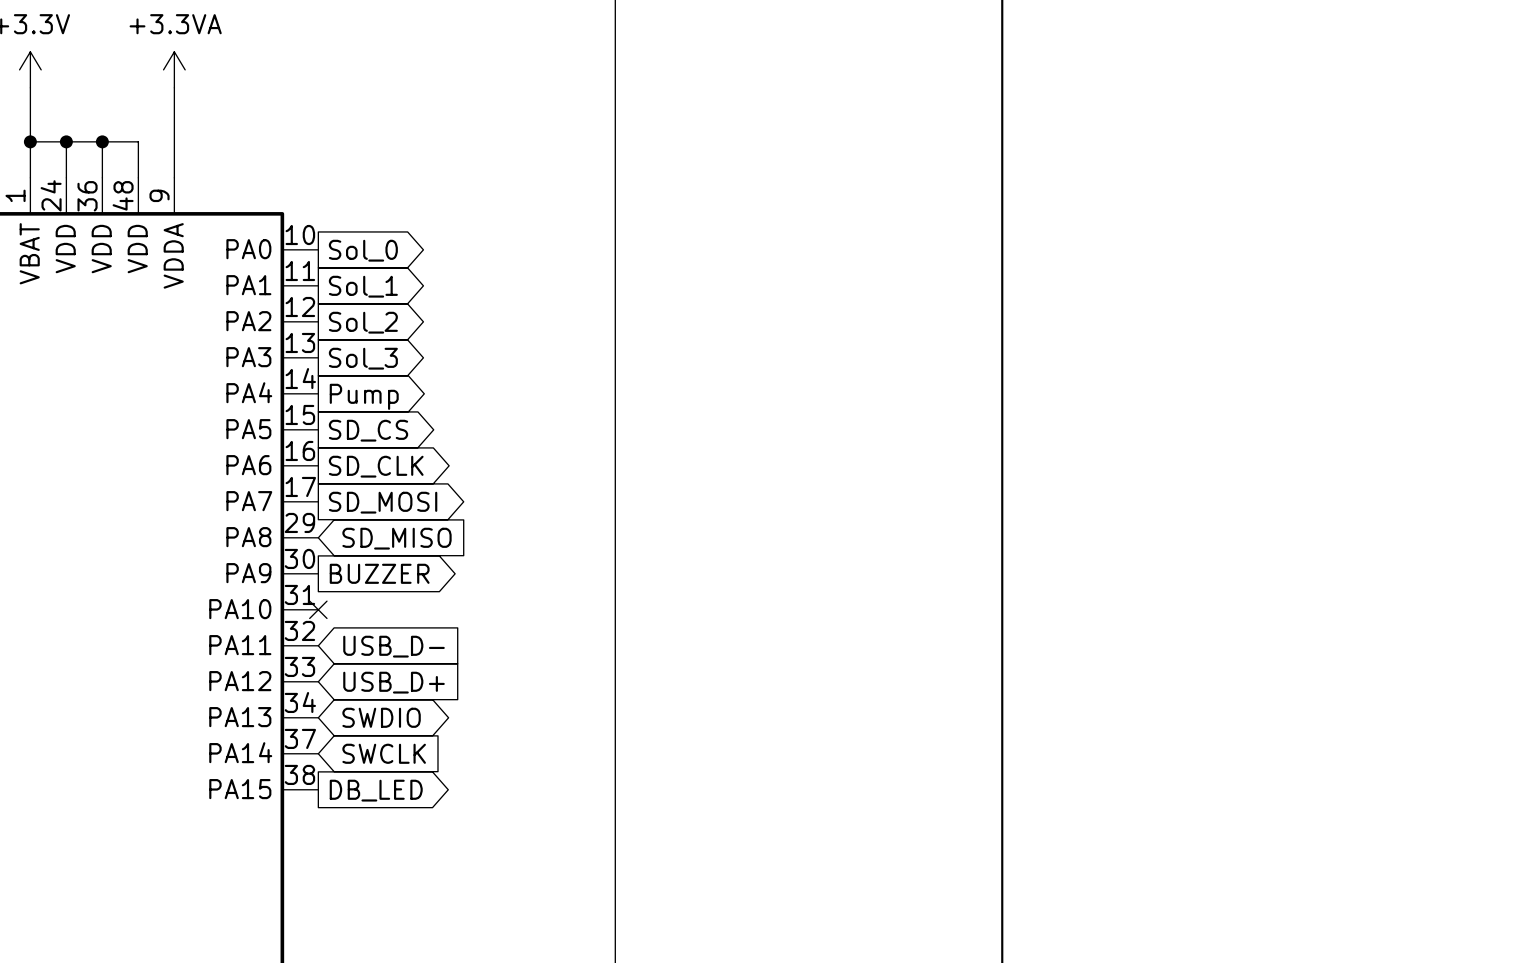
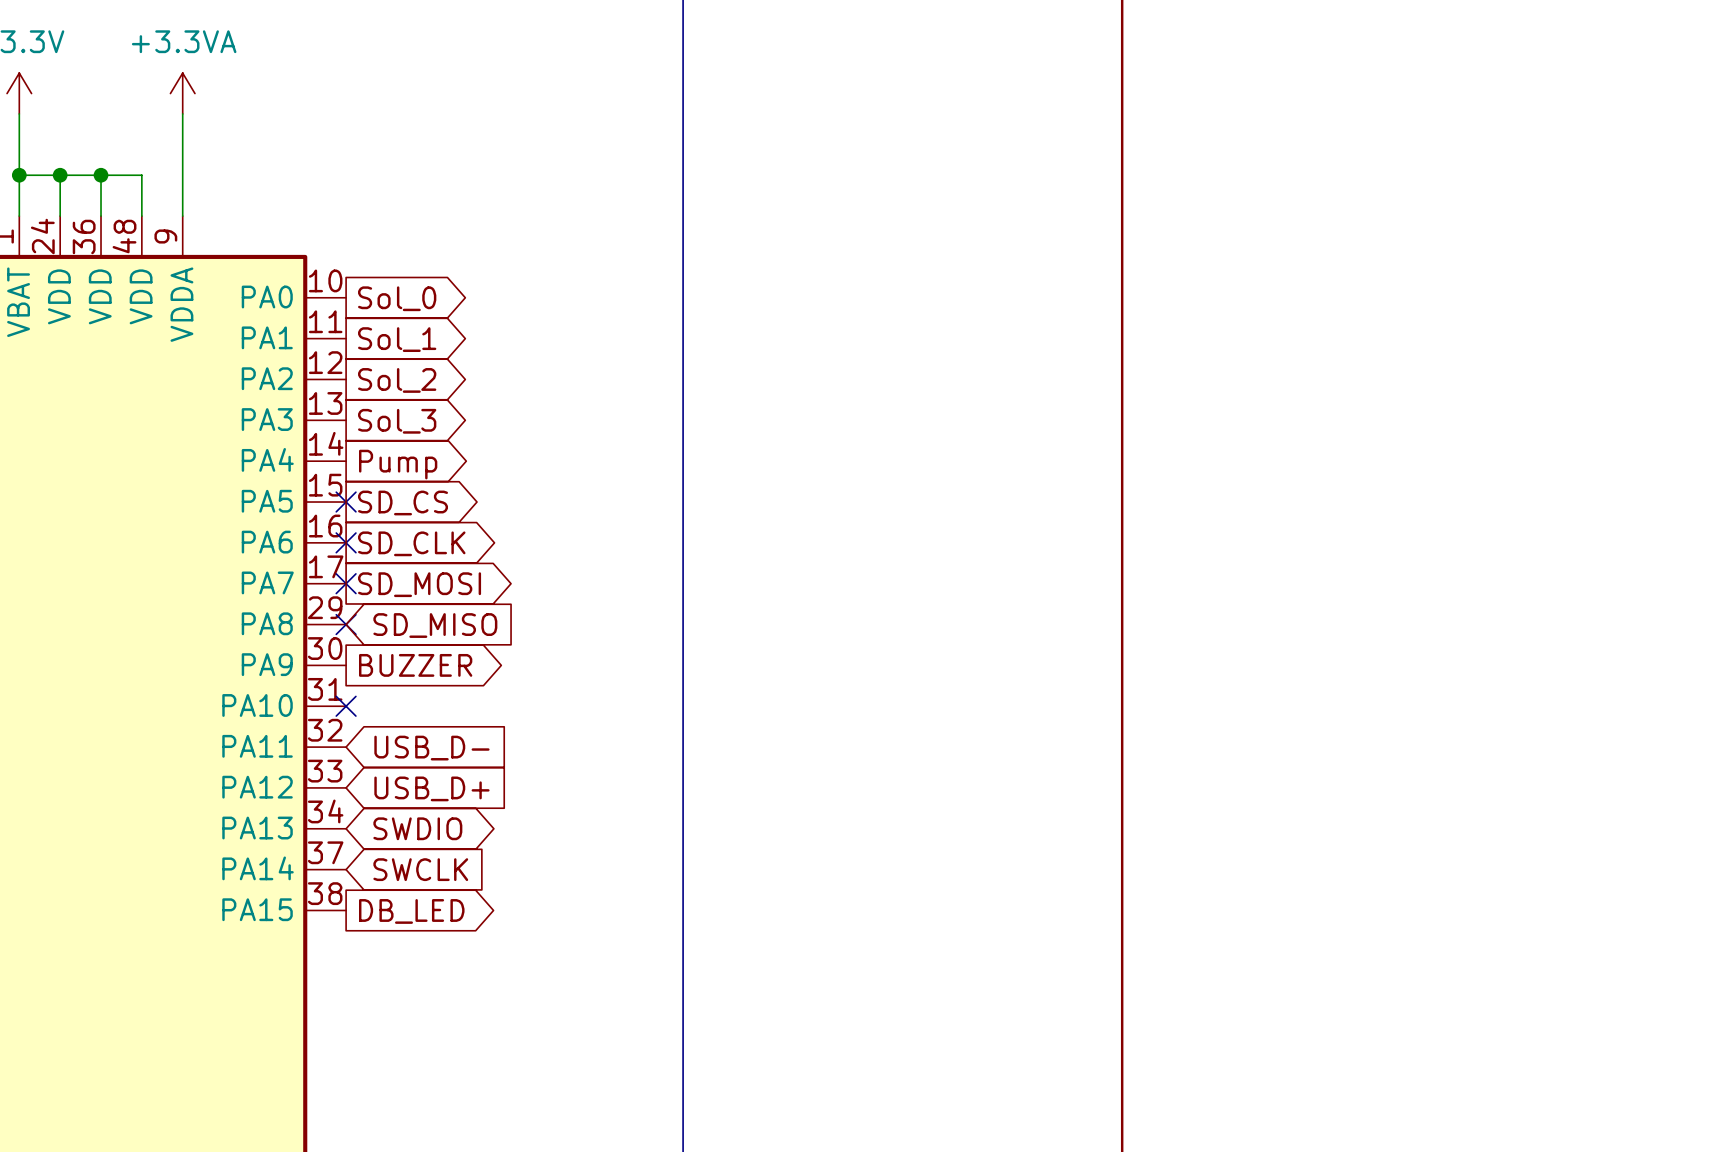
no-connect mark: none -> (346, 502)
no-connect mark: none -> (346, 542)
no-connect mark: none -> (346, 583)
no-connect mark: none -> (346, 624)

